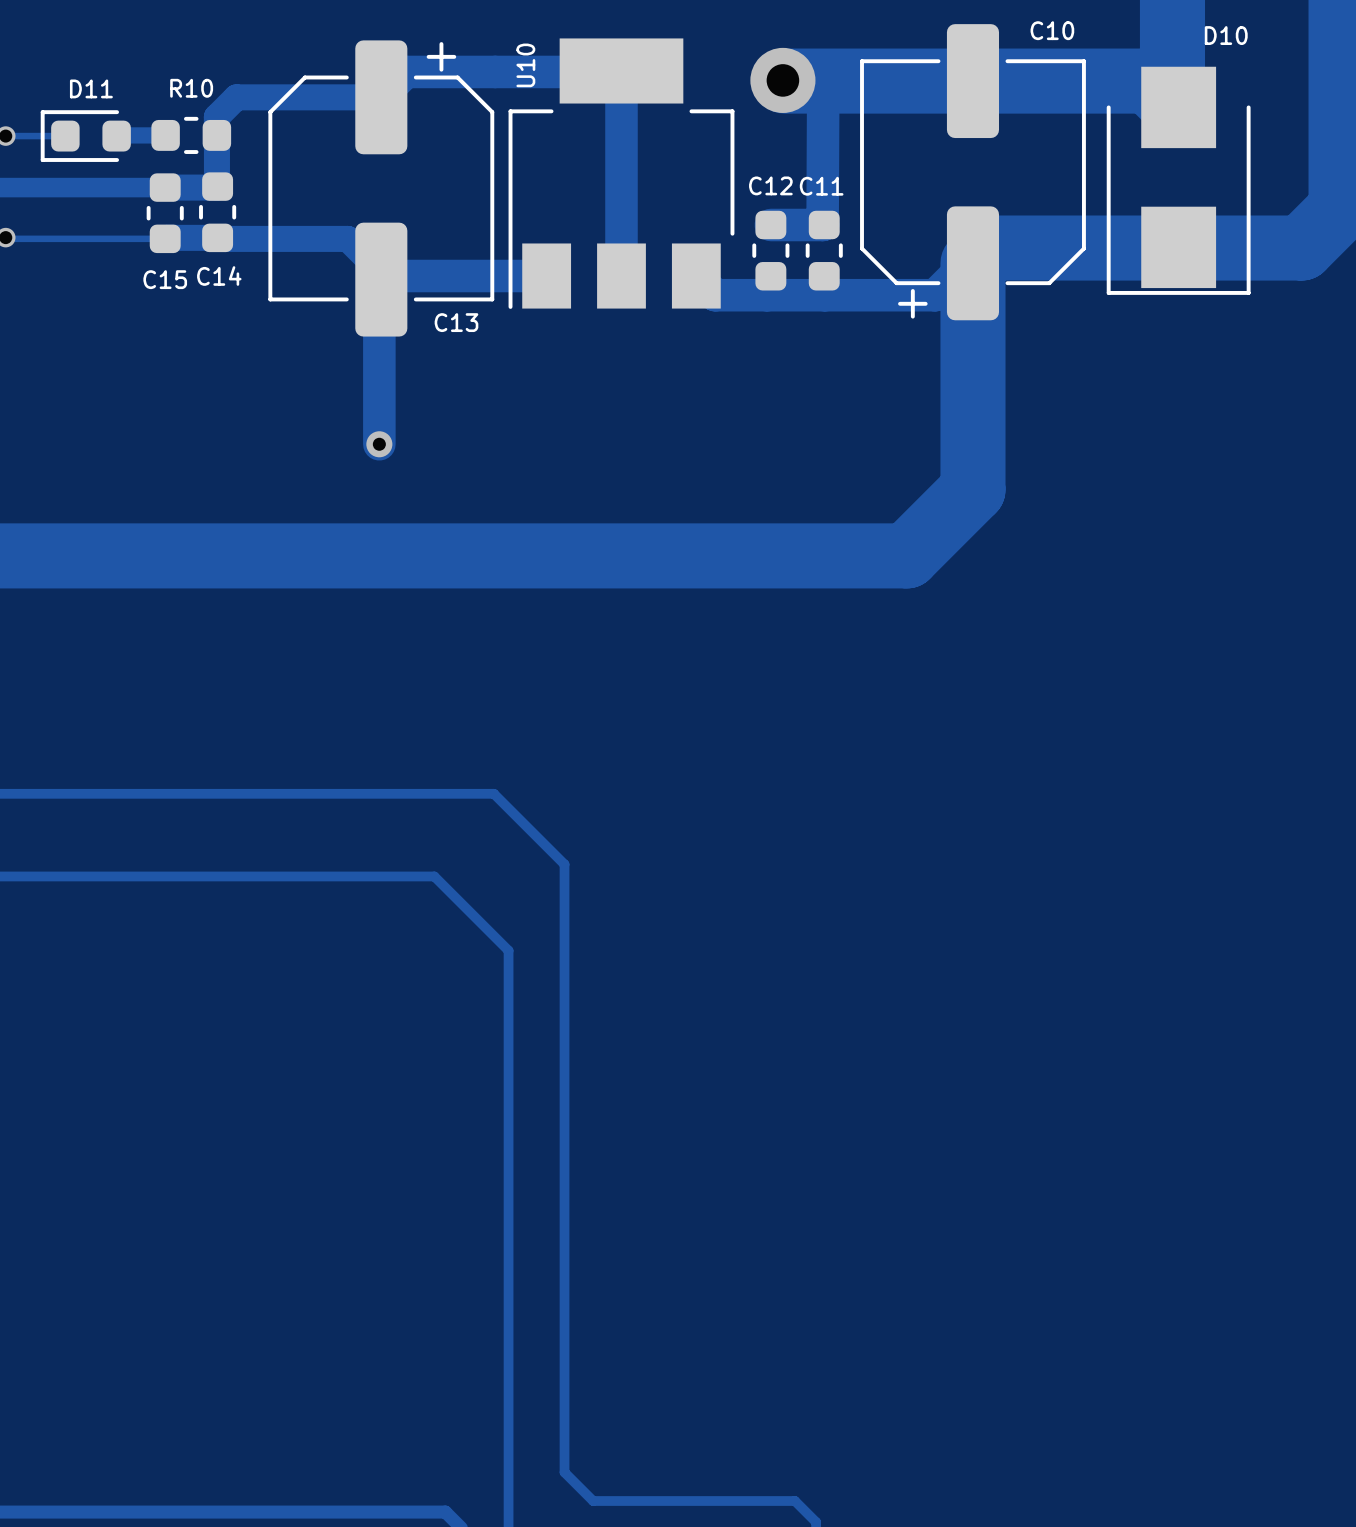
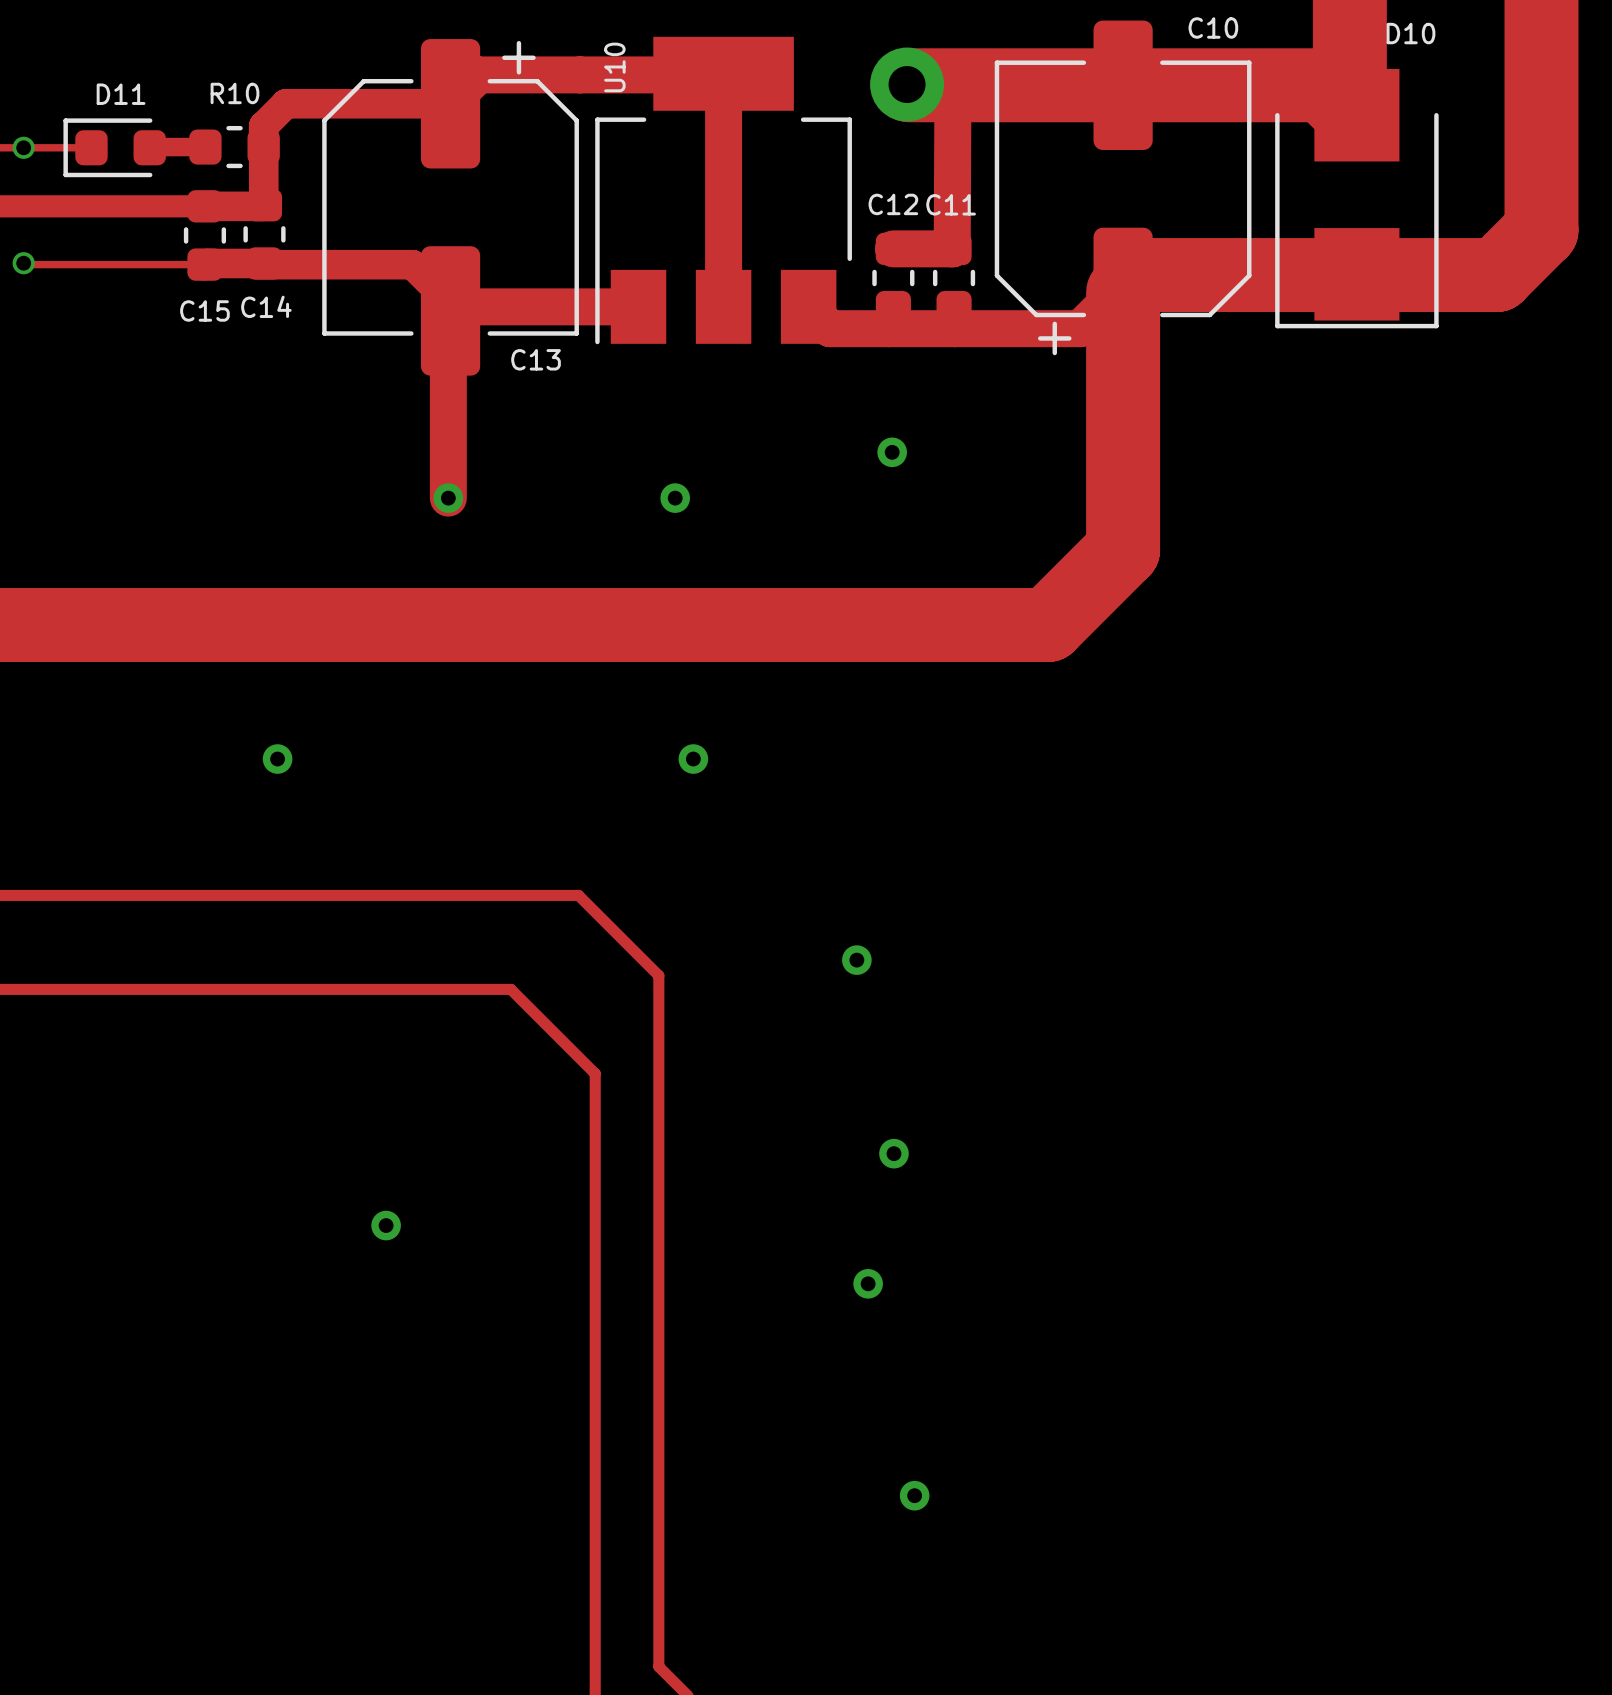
via: none -> (892, 452)
via: none -> (675, 498)
via: none -> (277, 759)
via: none -> (693, 759)
via: none -> (856, 960)
via: none -> (893, 1153)
via: none -> (386, 1225)
via: none -> (868, 1283)
via: none -> (914, 1495)

